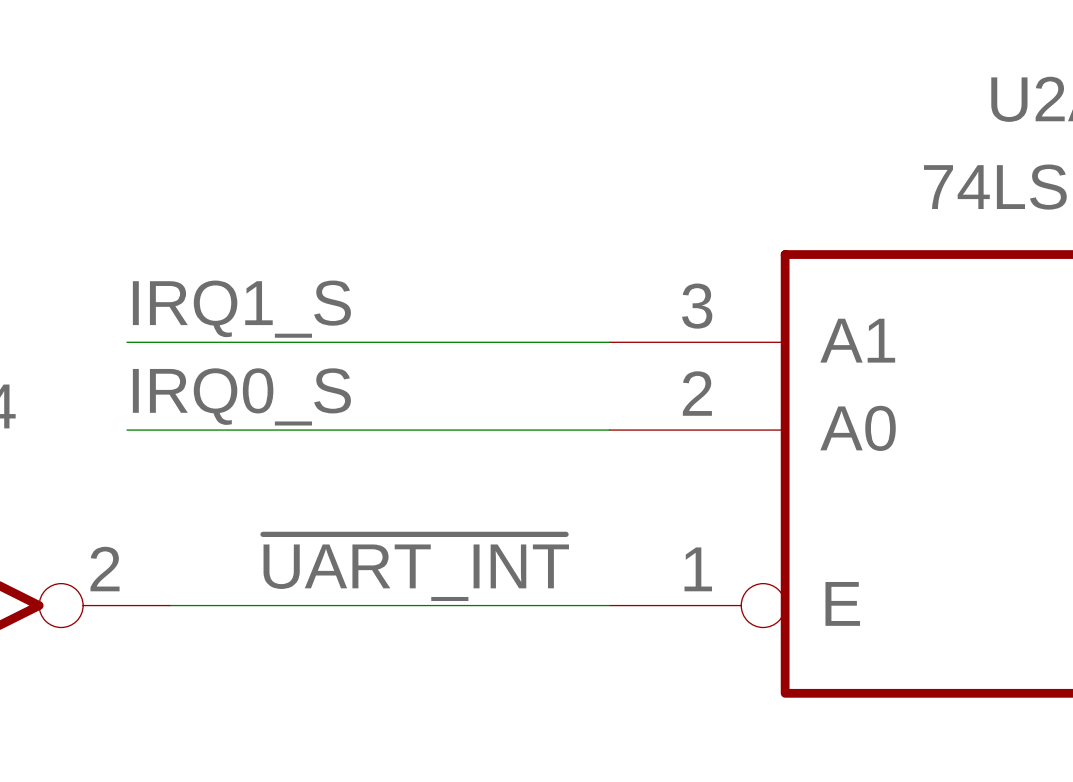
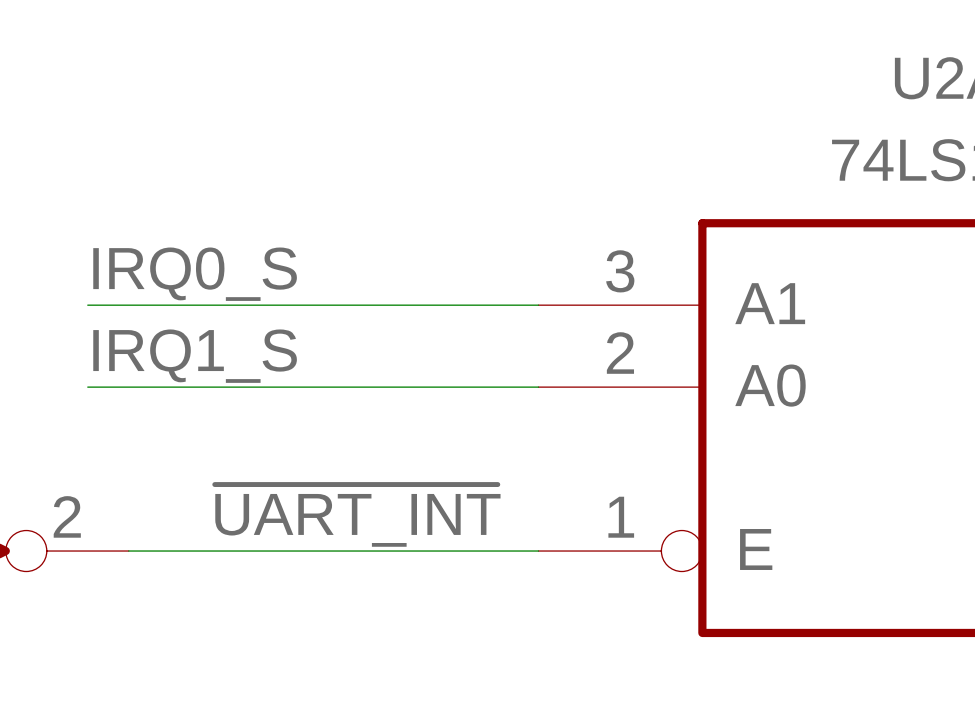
label: IRQ1_S (241, 309) -> IRQ0_S (195, 274)
label: IRQ0_S (241, 396) -> IRQ1_S (195, 356)

